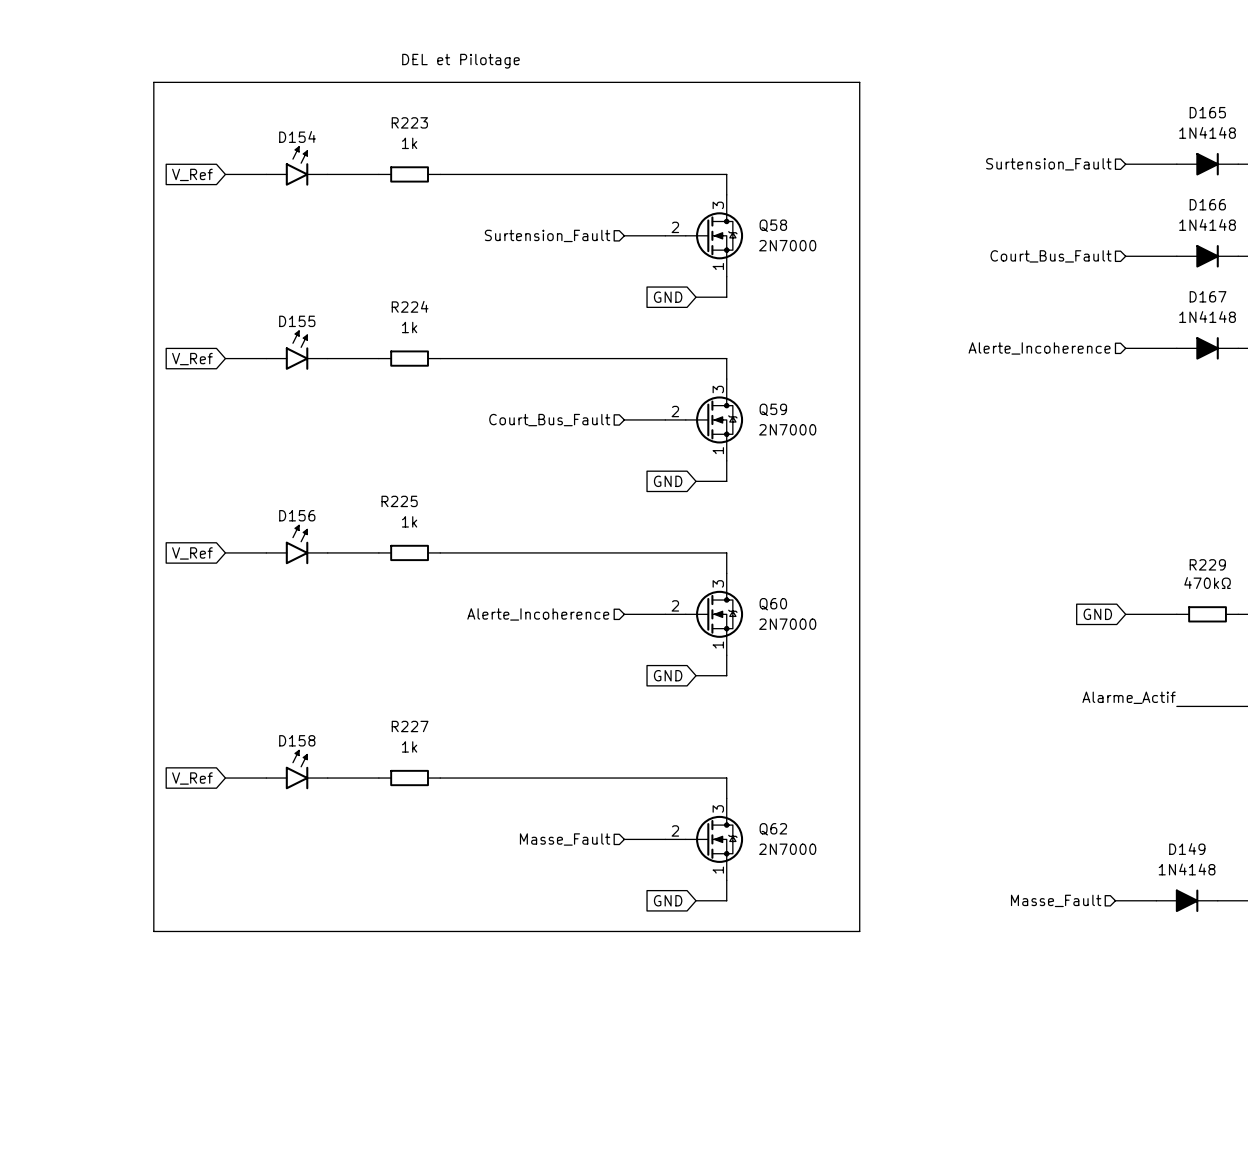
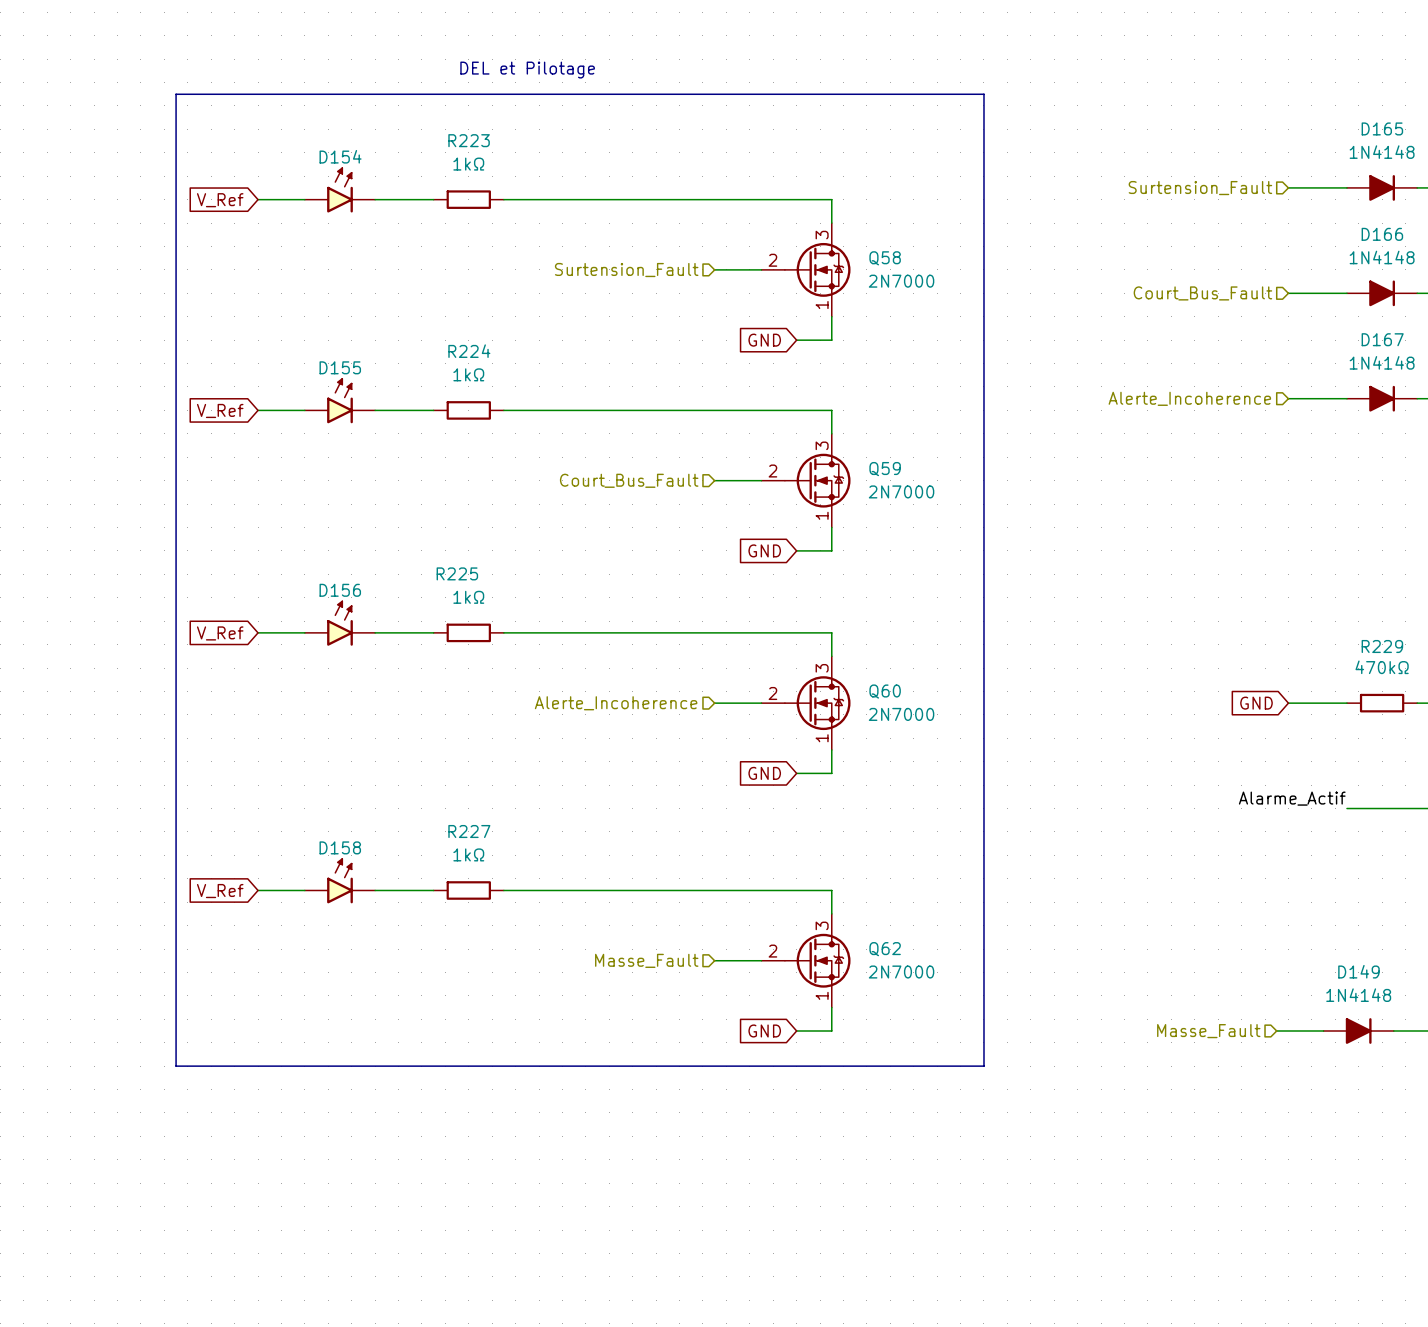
R223 value: 1k (409, 143) -> 1kΩ (468, 164)
R224 value: 1k (409, 327) -> 1kΩ (468, 374)
R225 value: 1k (409, 521) -> 1kΩ (468, 597)
R227 value: 1k (409, 746) -> 1kΩ (468, 854)

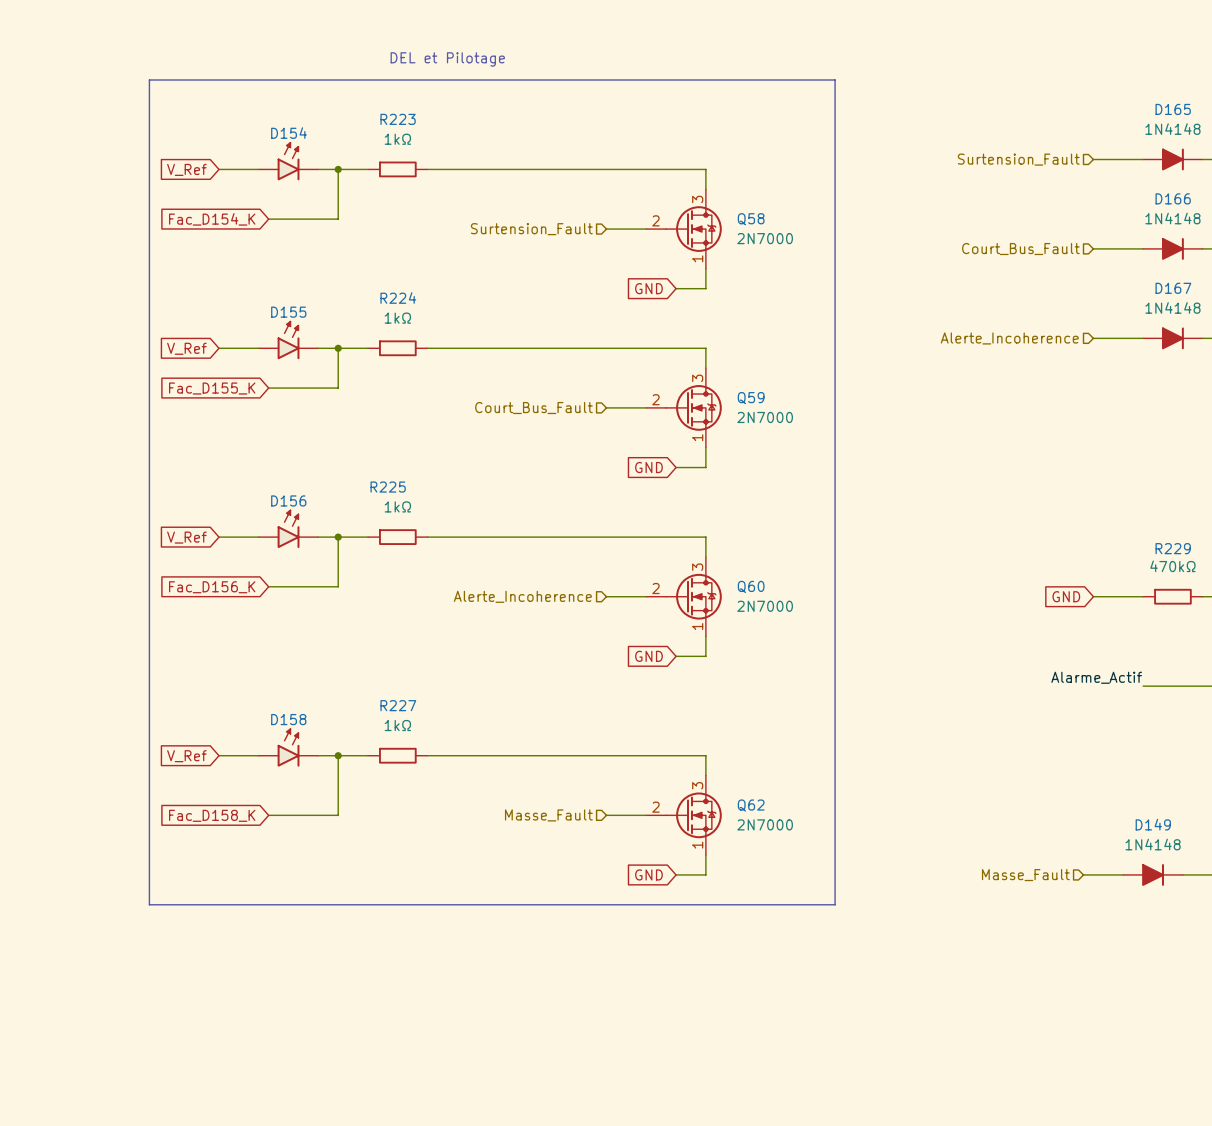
wire: none -> (338, 169) (338, 219) (268, 219)
junction: none -> (338, 169)
global label: none -> Fac_D154_K (212, 219)
wire: none -> (338, 348) (338, 388) (268, 388)
junction: none -> (338, 348)
global label: none -> Fac_D155_K (212, 388)
wire: none -> (338, 537) (338, 586) (268, 586)
junction: none -> (338, 537)
global label: none -> Fac_D156_K (212, 587)
wire: none -> (338, 755) (338, 815) (268, 815)
junction: none -> (338, 755)
global label: none -> Fac_D158_K (212, 815)

